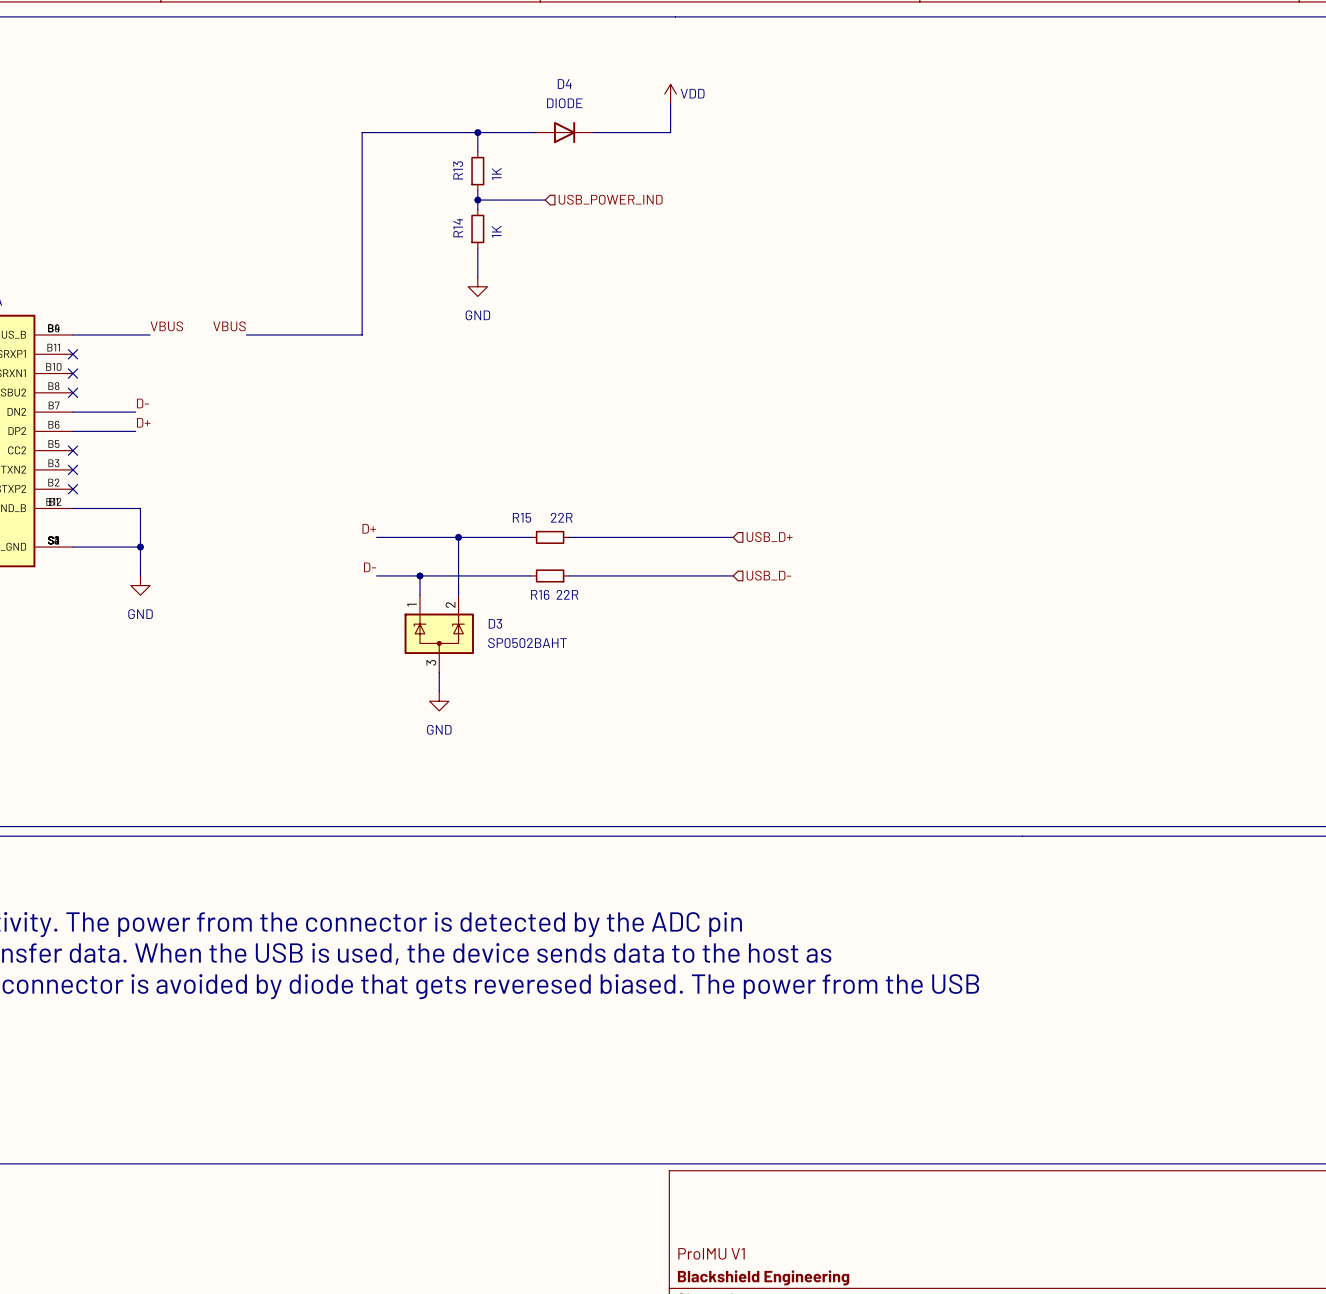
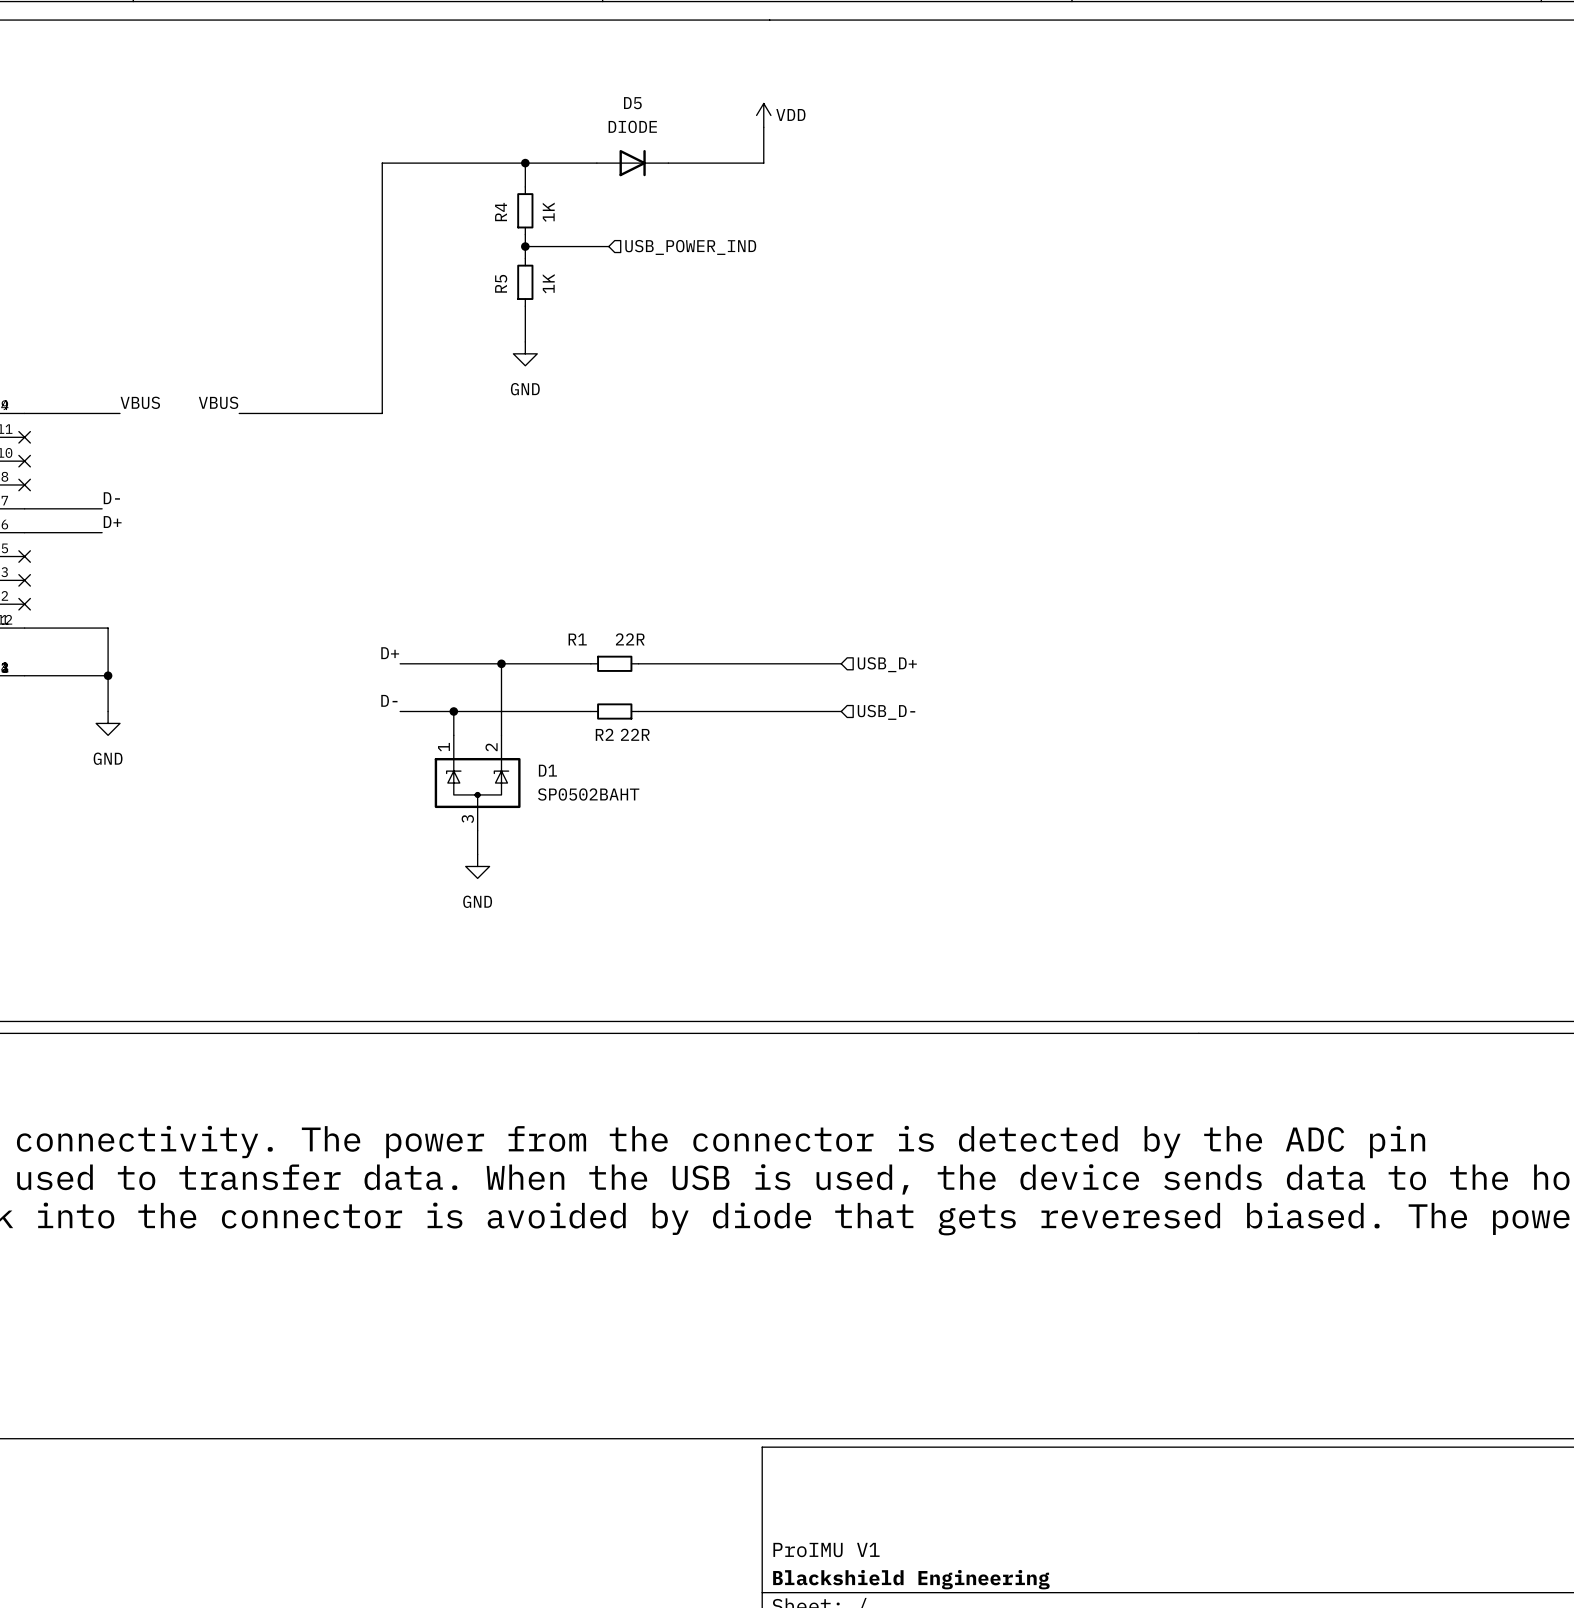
D4 name: D4 (564, 84) -> D5 (632, 103)
R13 name: R13 (458, 170) -> R4 (501, 212)
R14 name: R14 (458, 227) -> R5 (501, 283)
R15 name: R15 (522, 517) -> R1 (577, 639)
R16 name: R16 (540, 594) -> R2 (604, 734)
D3 name: D3 (495, 623) -> D1 (547, 770)

